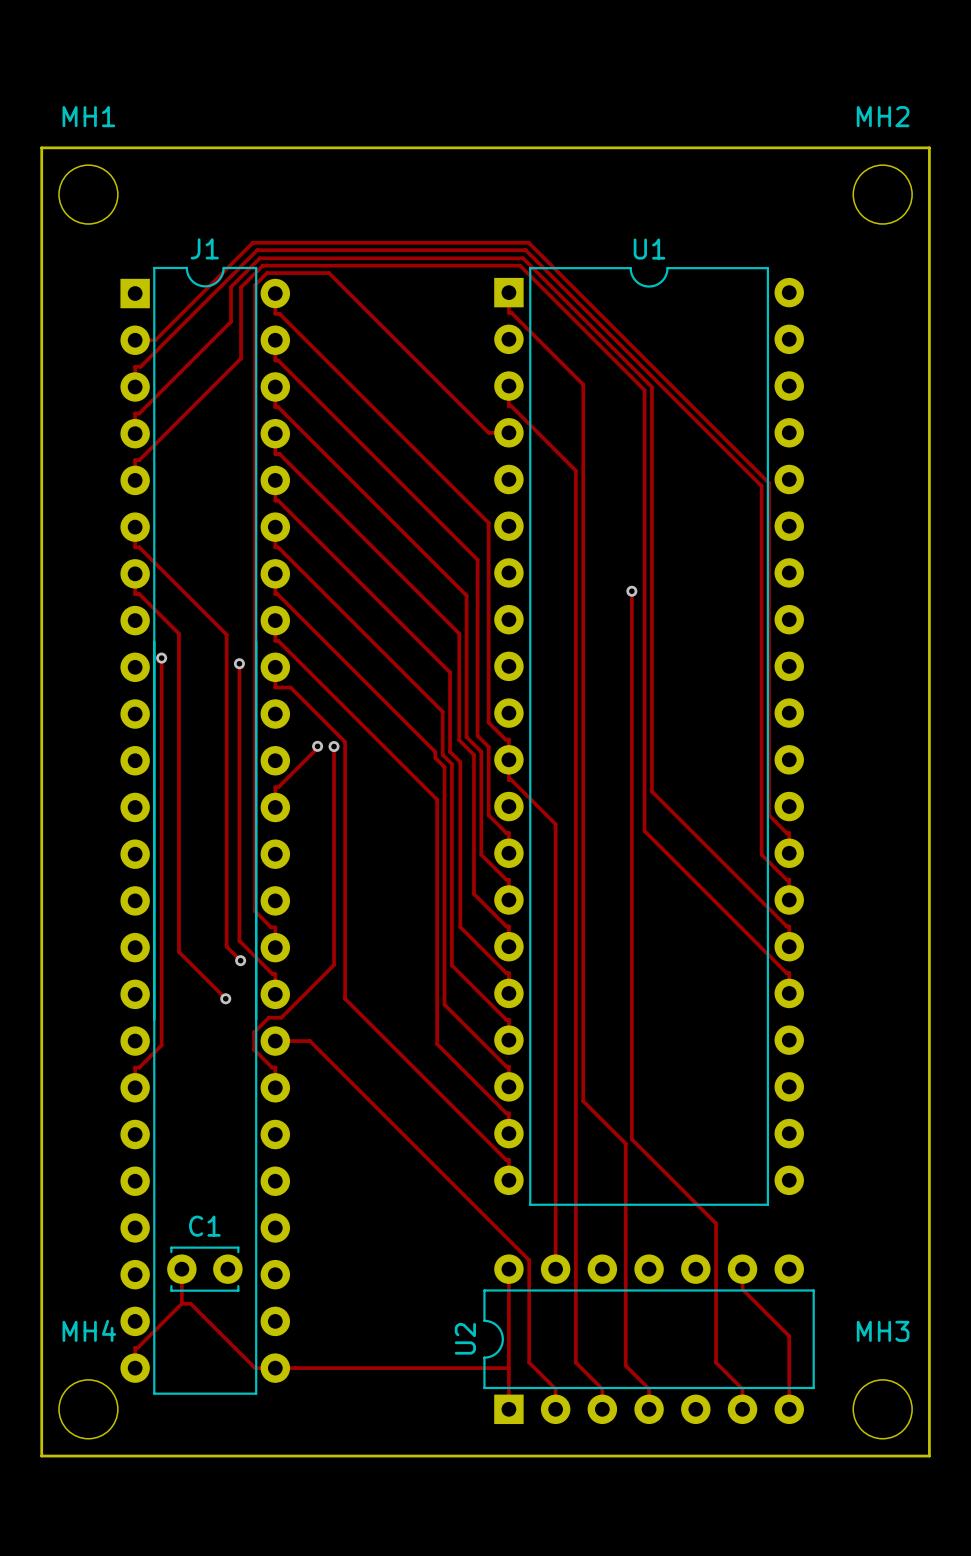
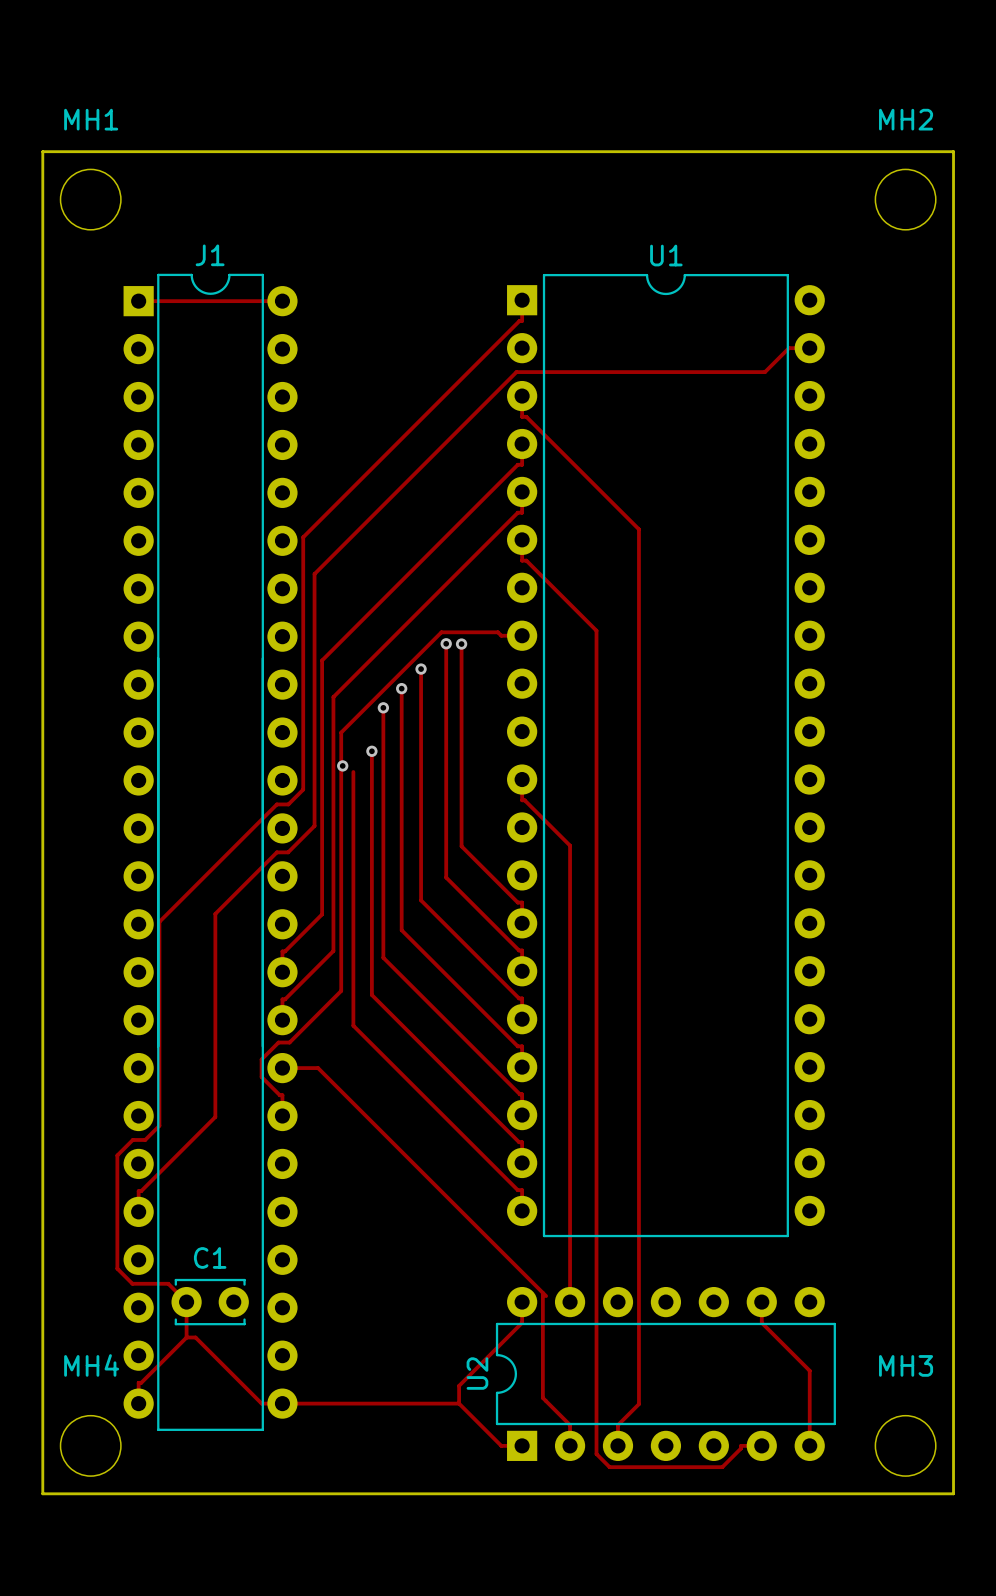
track: (275, 293) (275, 313) (279, 313) (488, 522) (488, 722) (505, 739) (508, 739) (508, 759) -> (282, 301) (138, 301)
track: (508, 312) (511, 312) (583, 384) (583, 1101) (625, 1143) (625, 1365) (649, 1389) (649, 1409) -> (522, 320) (519, 320) (303, 537) (303, 789) (288, 804) (276, 804) (159, 921) (159, 1125) (145, 1139) (132, 1139) (117, 1155) (117, 1268) (132, 1283) (168, 1283) (186, 1302)
track: none -> (809, 348) (788, 348) (764, 372) (516, 372) (314, 574) (314, 825) (288, 852) (276, 852) (215, 913) (215, 1117) (141, 1191) (138, 1191) (138, 1211)
track: (135, 340) (155, 340) (252, 242) (528, 242) (769, 483) (769, 815) (786, 833) (789, 833) (789, 853) -> none
track: (275, 340) (275, 360) (278, 360) (477, 559) (477, 735) (488, 746) (488, 815) (506, 833) (508, 833) (508, 853) -> none
track: (135, 386) (135, 366) (140, 366) (257, 250) (525, 250) (761, 486) (761, 854) (786, 879) (789, 879) (789, 899) -> none
track: (275, 386) (275, 407) (278, 407) (466, 595) (466, 737) (481, 751) (481, 854) (506, 879) -> (461, 644) (461, 846) (519, 902)
track: (511, 406) (575, 470) (575, 1362) (602, 1389) -> (524, 416) (638, 529) (638, 1404) (617, 1425)
track: (508, 432) (488, 432) (328, 273) (267, 273) (255, 285) (255, 911) (271, 927) (275, 927) -> (522, 444) (522, 464) (517, 464) (322, 660) (322, 914) (285, 951) (282, 951)
track: (135, 433) (135, 413) (139, 413) (231, 321) (231, 287) (259, 258) (523, 258) (651, 387) (651, 791) (786, 926) (789, 926) (789, 946) -> none
track: (275, 433) (275, 453) (279, 453) (459, 633) (459, 740) (473, 754) (473, 894) (506, 926) -> (446, 643) (446, 877) (519, 950)
track: (135, 480) (135, 460) (139, 460) (241, 358) (241, 287) (262, 265) (520, 265) (644, 390) (644, 831) (786, 973) (789, 973) (789, 993) -> none
track: (275, 480) (275, 500) (278, 500) (450, 672) (450, 751) (460, 762) (460, 927) (506, 973) -> (421, 669) (421, 900) (519, 998)
track: (135, 527) (135, 547) (139, 547) (226, 634) (226, 946) (240, 960) -> none
track: (275, 527) (275, 547) (278, 547) (442, 711) (442, 754) (451, 764) (451, 965) (506, 1019) -> (401, 688) (401, 930) (519, 1046)
track: (135, 573) (135, 594) (139, 594) (178, 633) (178, 951) (225, 998) -> none
track: (275, 573) (275, 594) (435, 751) (435, 757) (444, 767) (444, 1004) (506, 1066) -> (383, 707) (383, 957) (519, 1094)
track: (631, 591) (631, 1139) (716, 1223) (716, 1362) (742, 1389) (742, 1409) -> (522, 539) (522, 560) (526, 560) (596, 630) (596, 1454) (609, 1467) (722, 1467) (741, 1448) (741, 1445) (761, 1445)
via: (631, 591) -> none
track: (275, 620) (275, 640) (278, 640) (437, 799) (437, 1044) (506, 1113) -> (371, 751) (371, 995) (519, 1142)
via: none -> (446, 643)
via: none -> (461, 644)
via: none -> (421, 669)
track: (161, 658) (161, 1045) (139, 1067) (135, 1067) (135, 1087) -> none
via: (161, 658) -> none
track: (239, 663) (239, 940) (272, 974) (275, 974) -> (522, 491) (522, 512) (517, 512) (333, 697) (333, 950) (285, 999) (282, 999)
via: (239, 663) -> none
track: (275, 667) (275, 687) (290, 687) (345, 741) (345, 998) (506, 1160) -> (353, 772) (353, 1025) (519, 1190)
via: none -> (401, 688)
via: none -> (383, 707)
via: none -> (371, 751)
track: (317, 746) (278, 787) (275, 787) (275, 807) -> none
via: (317, 746) -> none
track: (334, 746) (334, 965) (281, 1017) (268, 1017) (254, 1032) (254, 1049) (272, 1067) -> (522, 635) (501, 635) (497, 632) (441, 632) (341, 732) (341, 990) (289, 1042) (278, 1042) (261, 1059) (261, 1076) (279, 1095)
via: (240, 960) -> none
via: (225, 998) -> none
track: (508, 1289) (508, 1409) -> (522, 1322) (459, 1385) (459, 1403) (501, 1445) (522, 1445)
track: (447, 1368) (508, 1368) -> none

